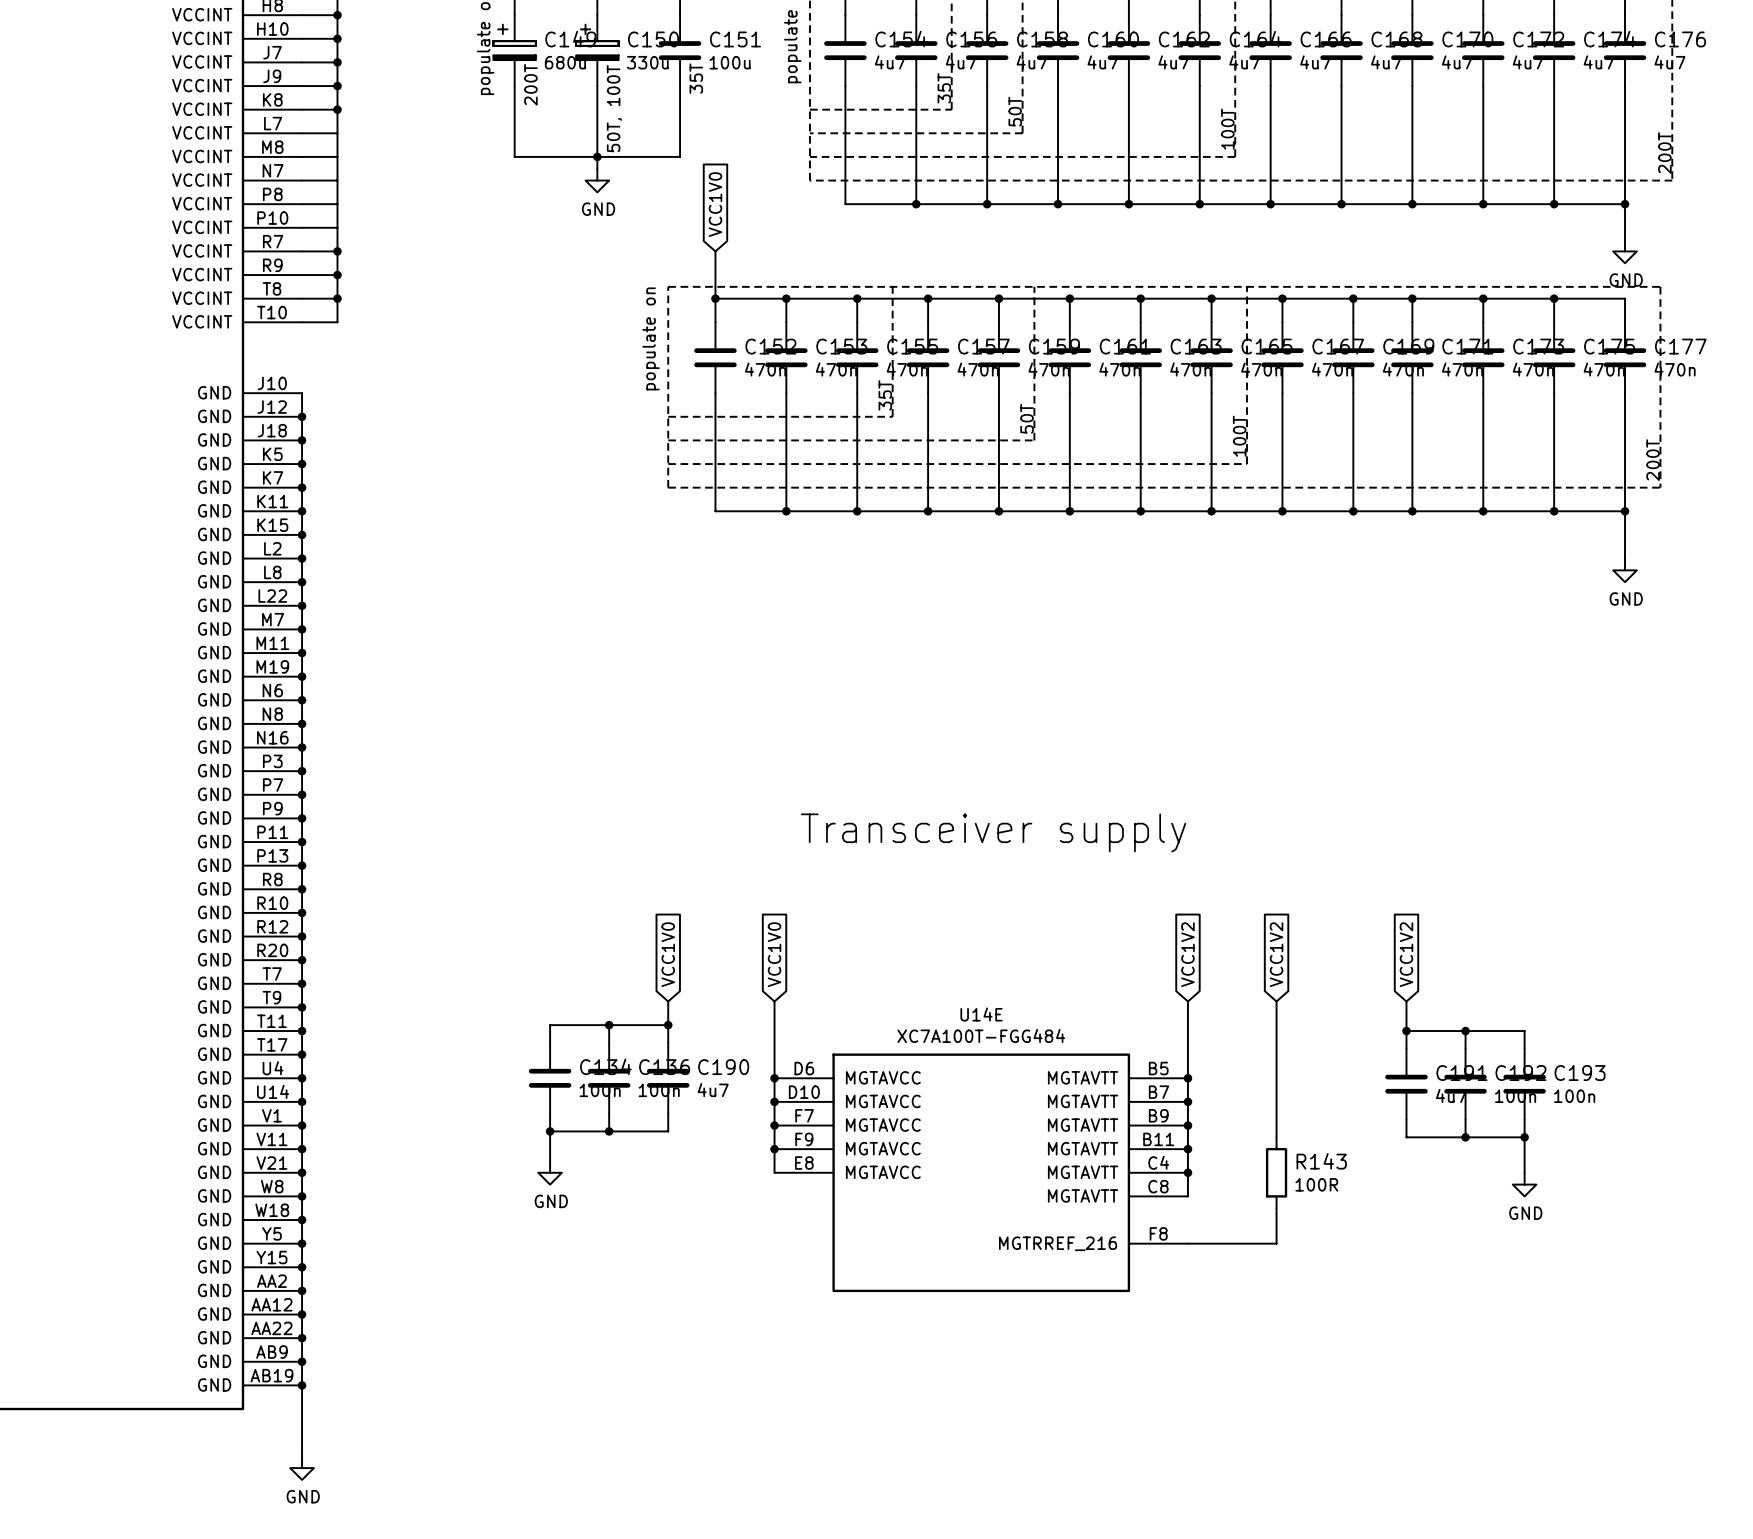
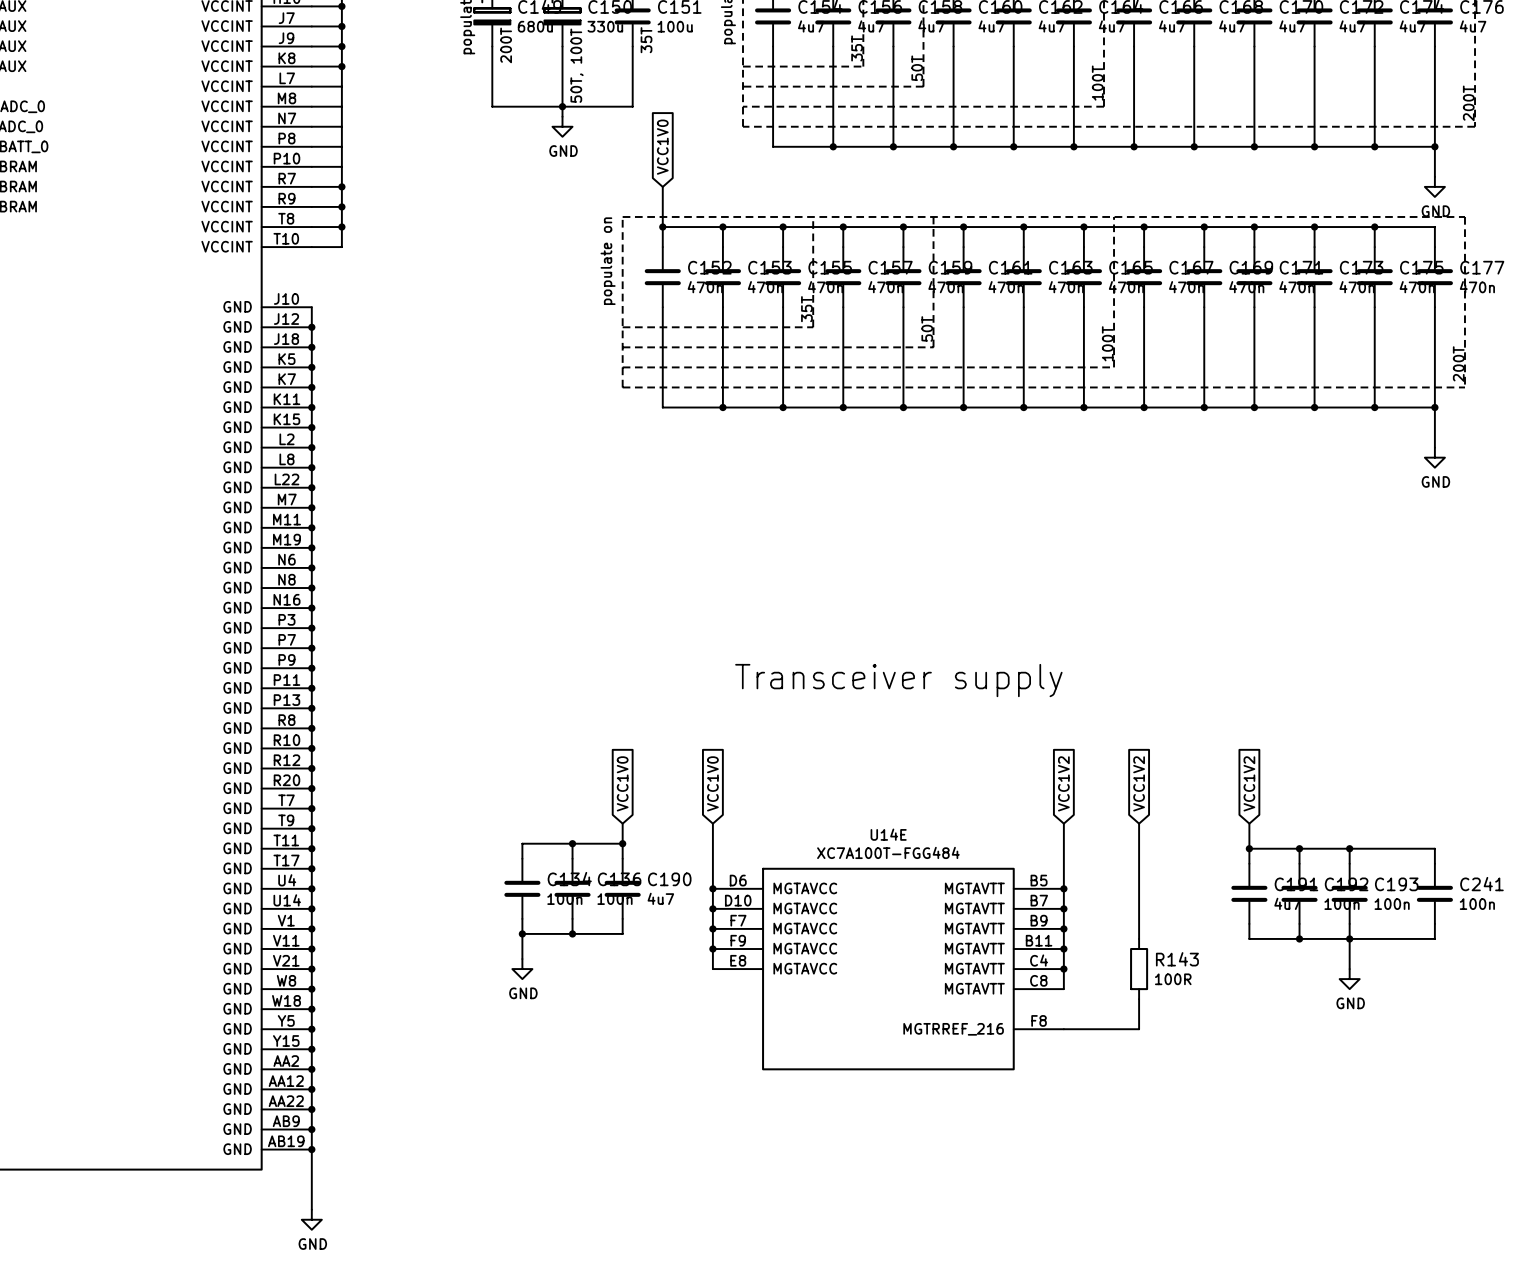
wire: none -> (1349, 848) (1434, 848) (1434, 863)
junction: none -> (1349, 848)
C241: none -> (1434, 893)
wire: none -> (1434, 923) (1434, 938) (1349, 938)

